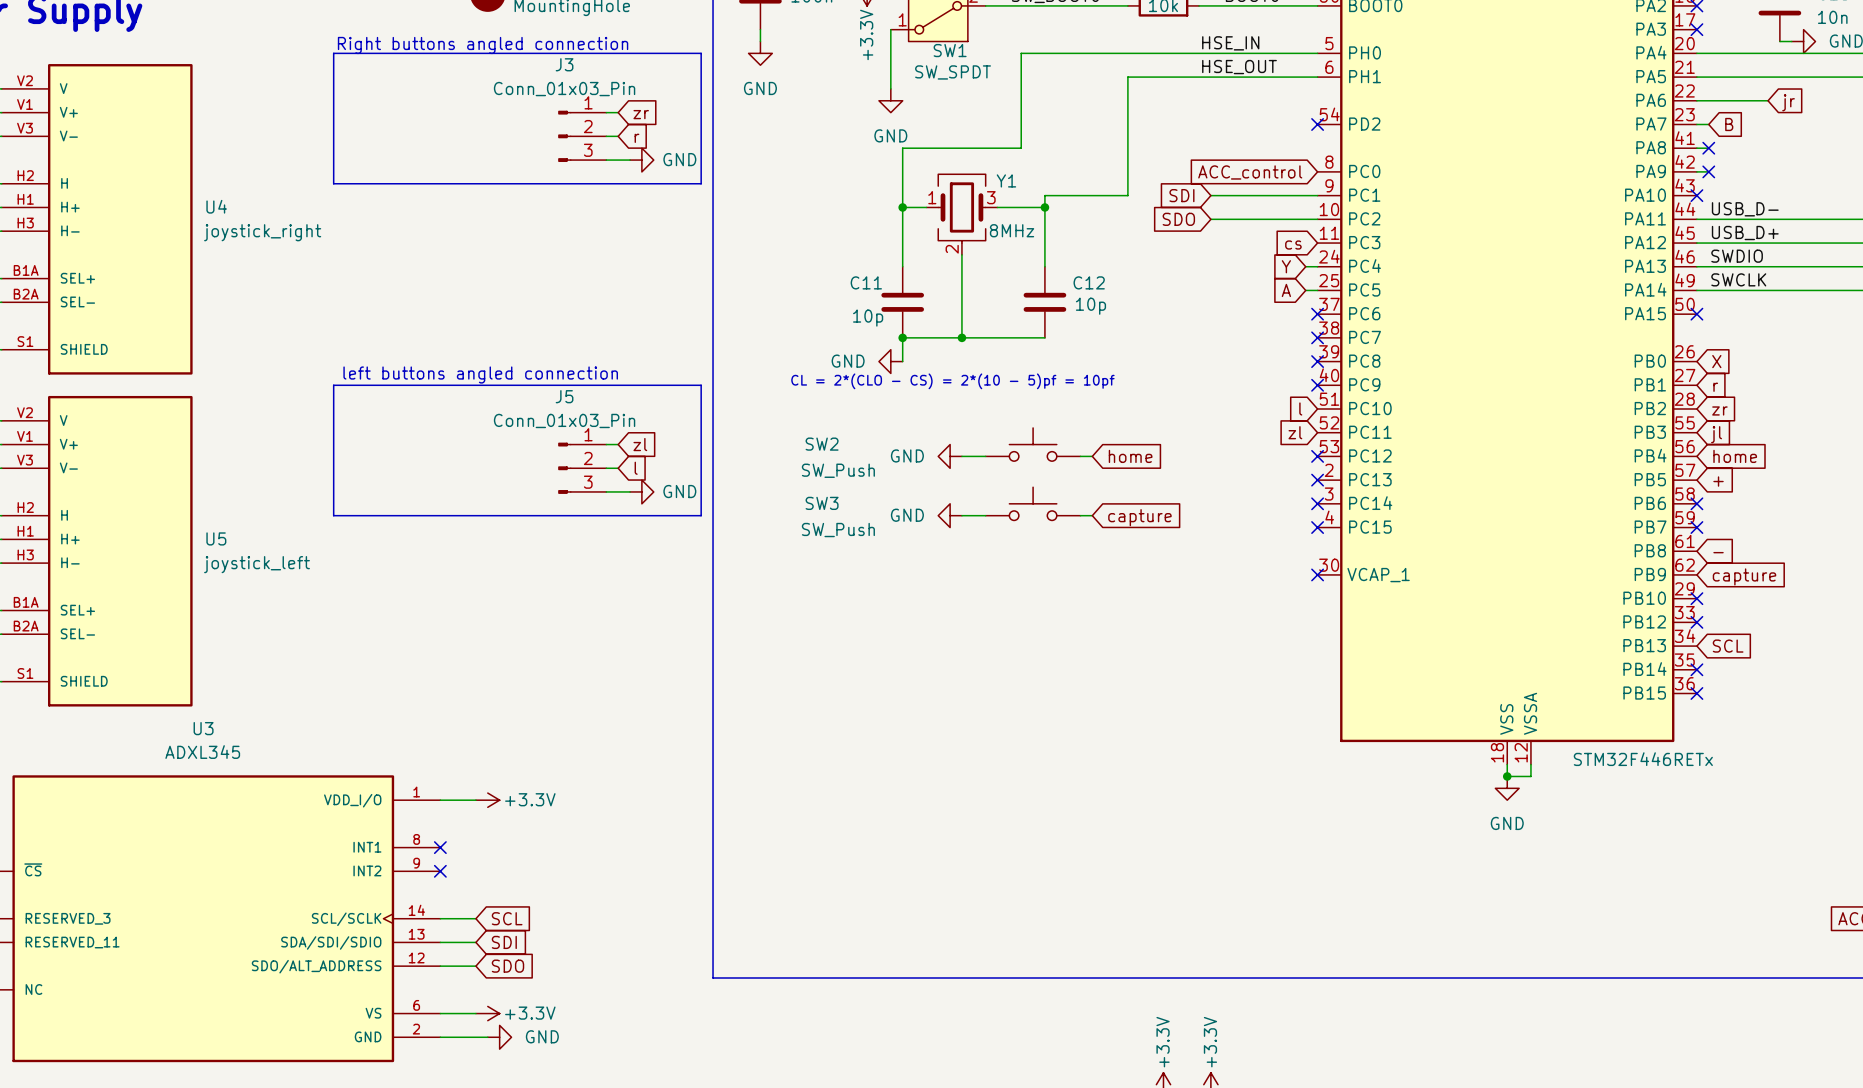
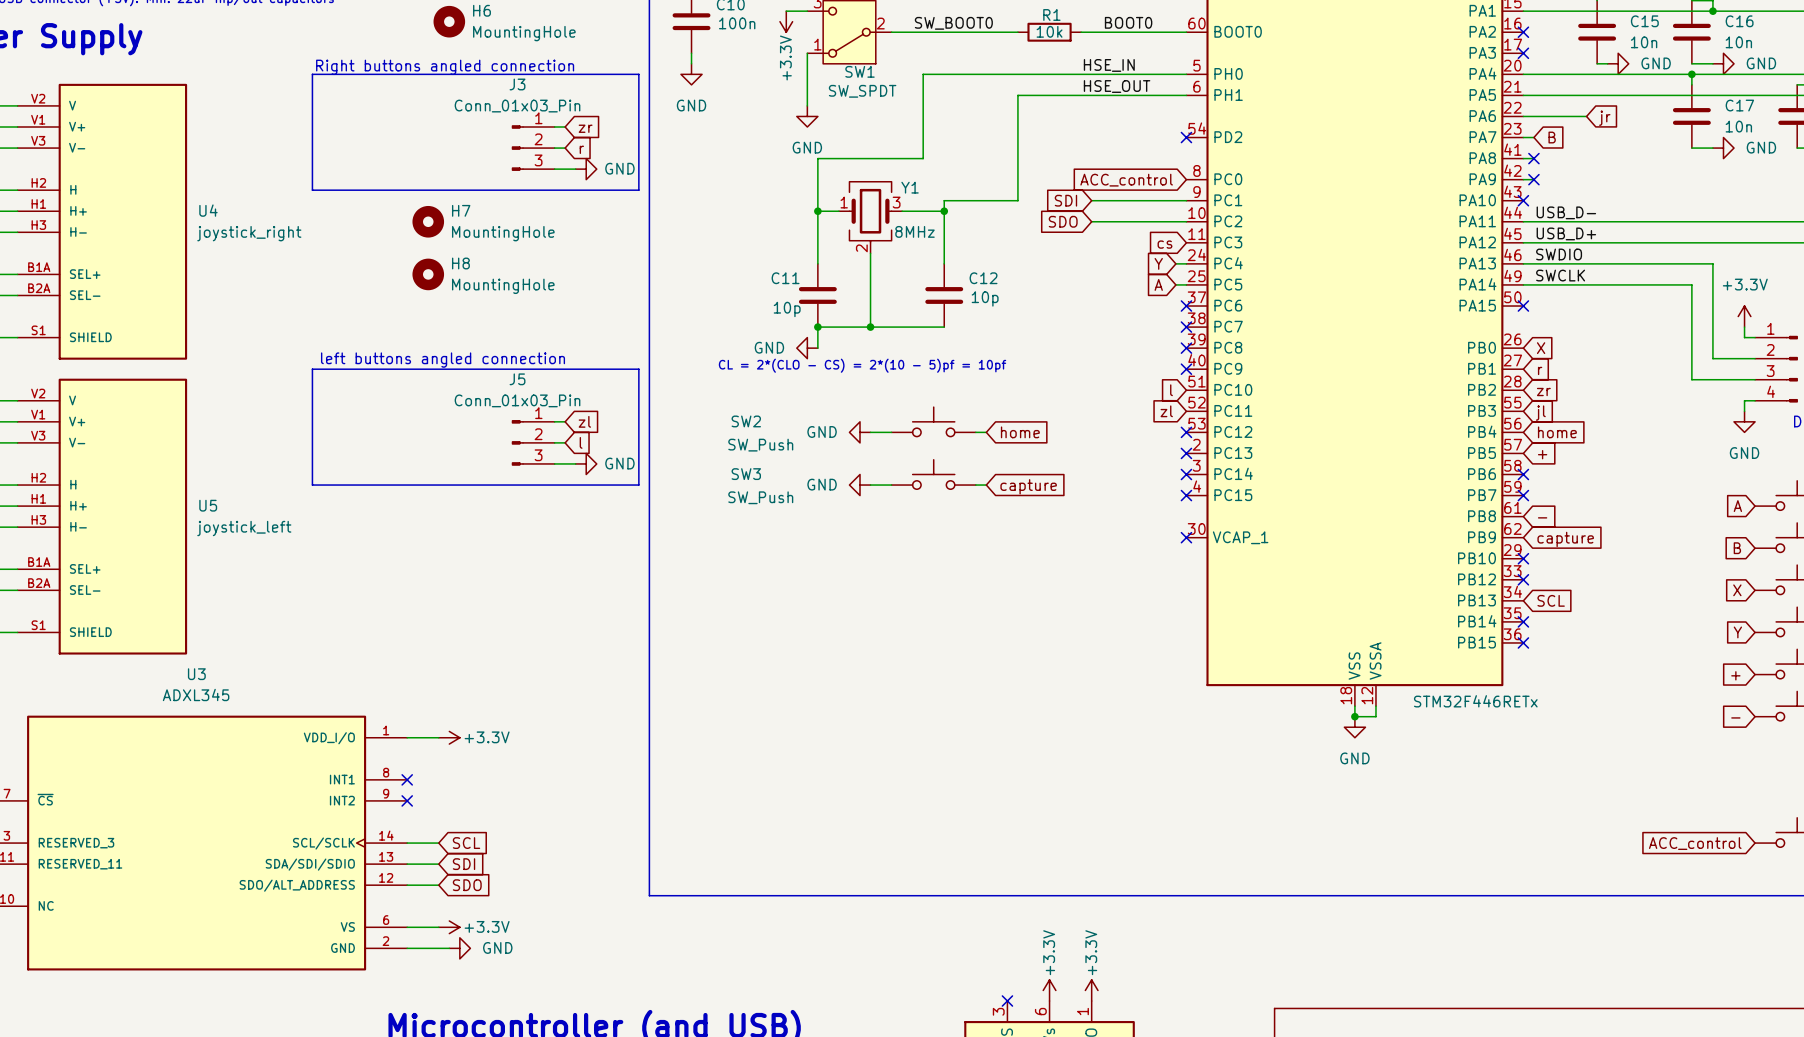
H7: none -> MountingHole (428, 221)
H8: none -> MountingHole (428, 274)

